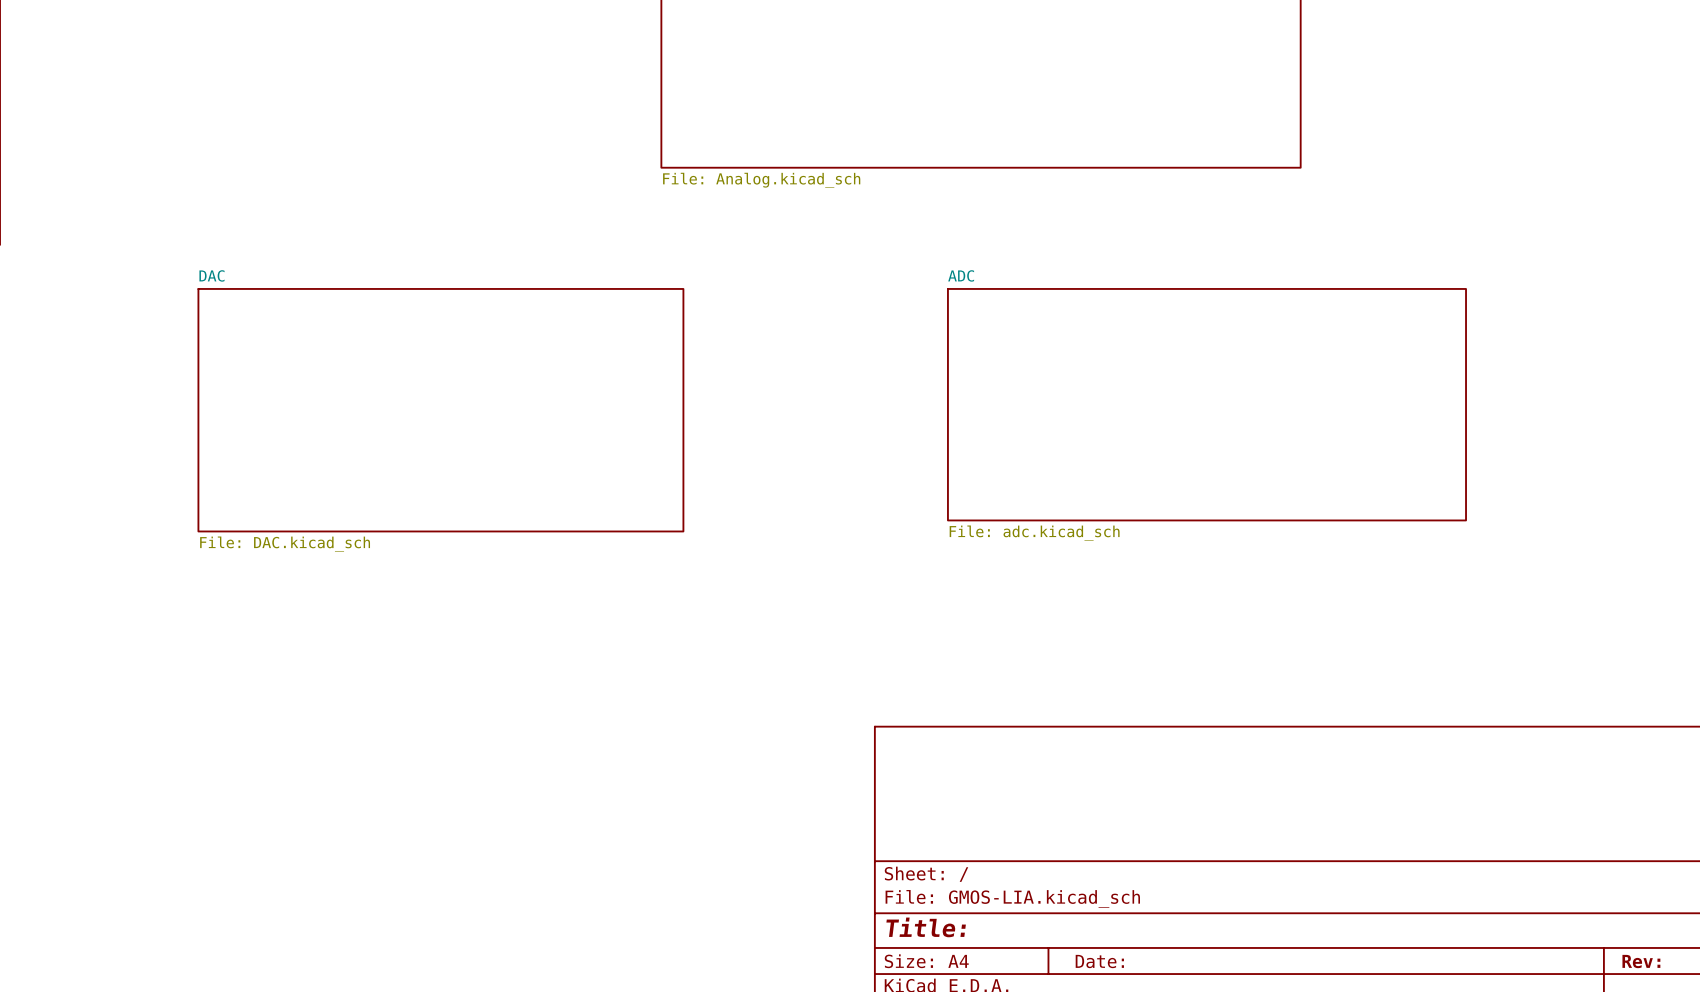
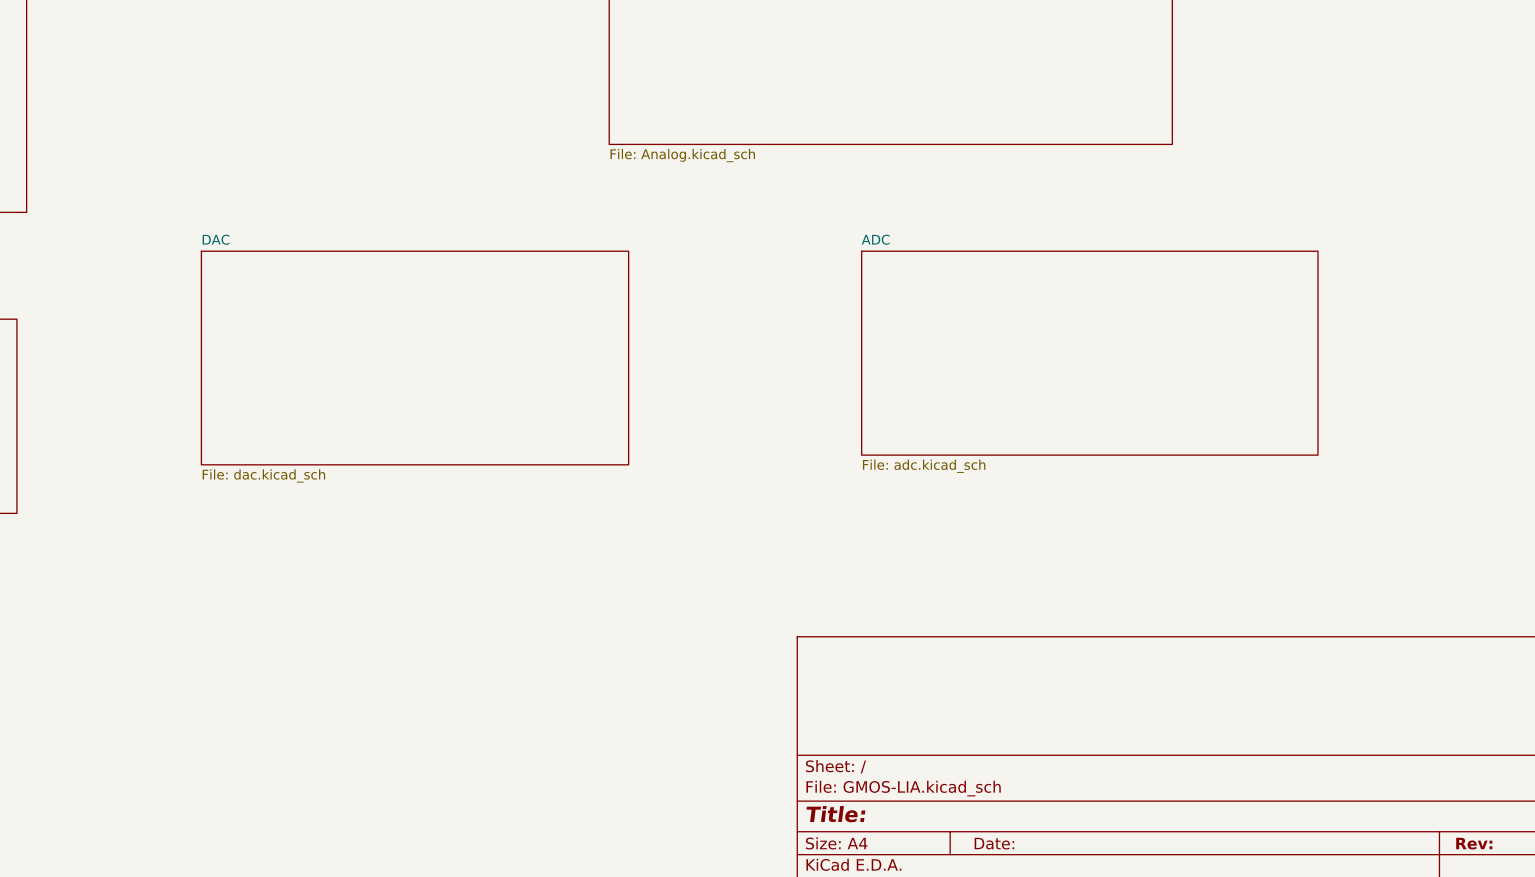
sheet DAC value: File: DAC.kicad_sch (285, 544) -> File: dac.kicad_sch (263, 475)

